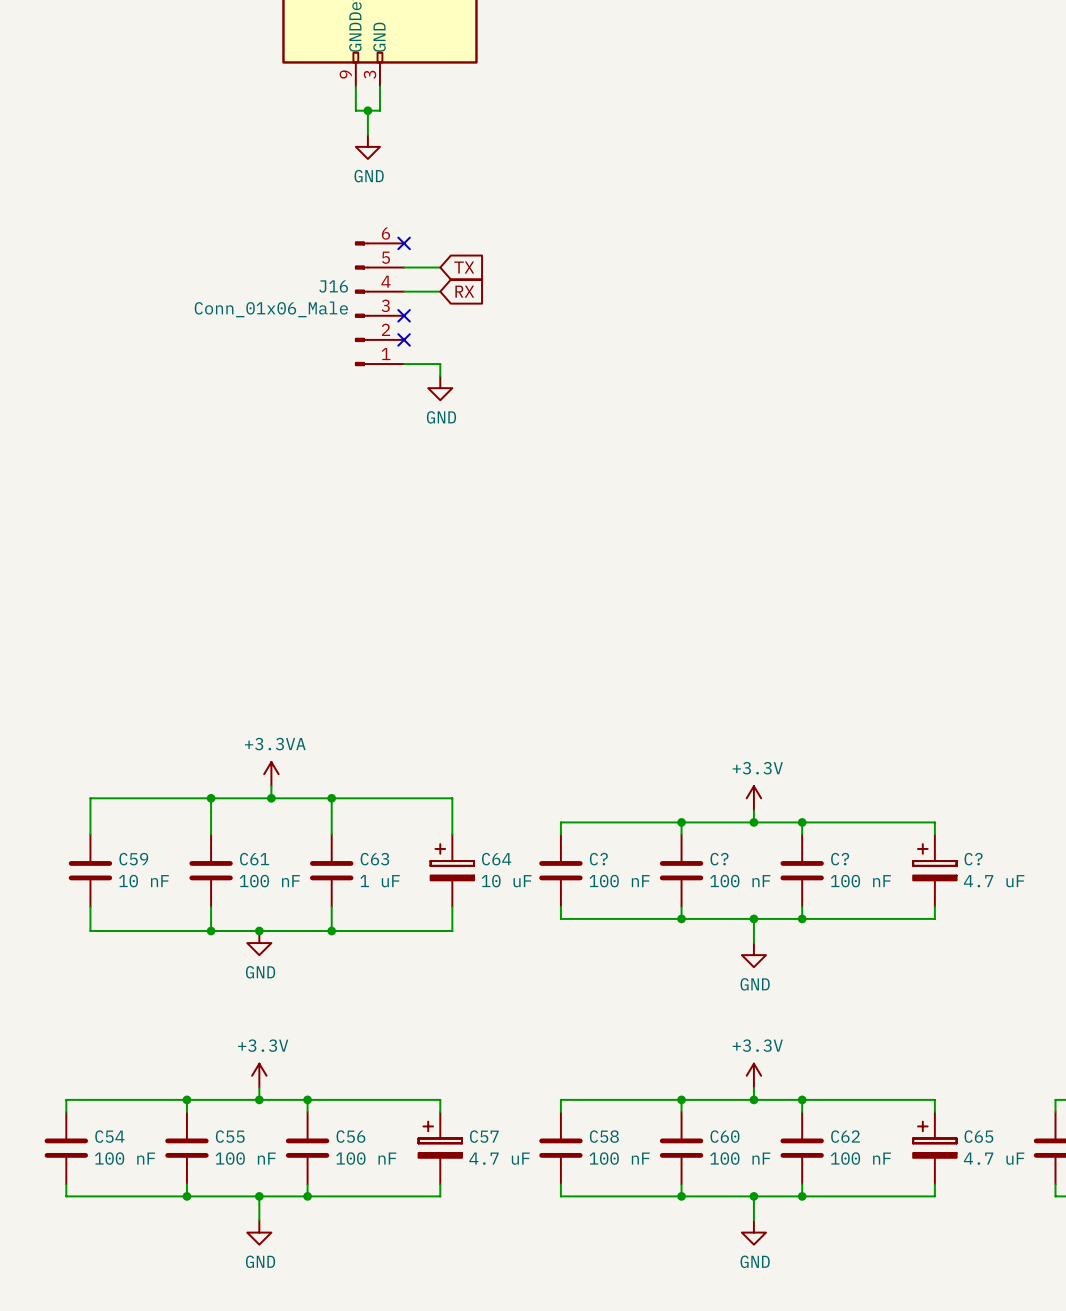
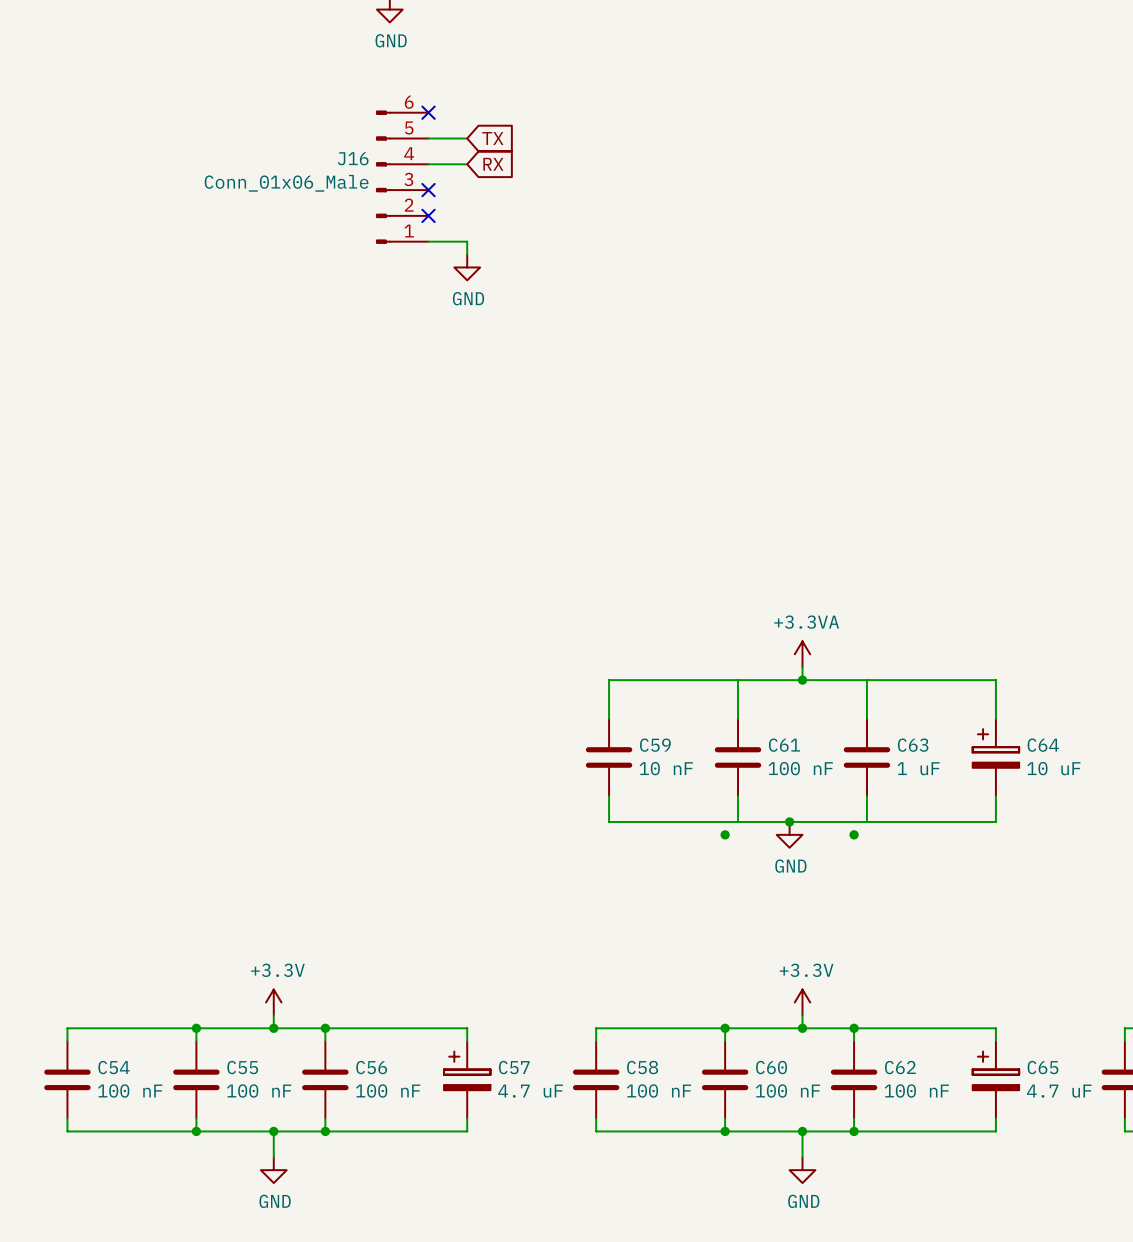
power symbol: none -> +3.3VA (802, 654)
power symbol: +3.3VA (271, 774) -> none
wire: none -> (738, 680) (738, 718)
junction: none -> (802, 680)
wire: none -> (866, 680) (866, 718)
wire: (271, 786) (271, 798) -> none
wire: (211, 798) (211, 834) -> none
junction: (211, 798) -> none
junction: (271, 798) -> none
wire: (331, 798) (331, 834) -> none
junction: (331, 798) -> none
power symbol: +3.3V (753, 798) -> none
wire: none -> (609, 718) (609, 680) (995, 680) (995, 718)
wire: (753, 810) (753, 822) -> (802, 667) (802, 680)
wire: (681, 822) (681, 834) -> none
junction: (681, 822) -> none
junction: (753, 822) -> none
wire: (802, 822) (802, 834) -> none
junction: (802, 822) -> none
wire: (90, 834) (90, 798) (452, 798) (452, 834) -> none
wire: (560, 834) (560, 822) (934, 822) (934, 834) -> none
C59 position: (90, 870) -> (609, 757)
C61 position: (211, 870) -> (738, 757)
C63 position: (331, 870) -> (866, 757)
C64 position: (452, 870) -> (995, 757)
C?: 100 nF (560, 870) -> none
C?: 100 nF (681, 870) -> none
C?: 100 nF (802, 870) -> none
C?: 4.7 uF (934, 870) -> none
wire: none -> (609, 796) (609, 821) (995, 821) (995, 796)
wire: none -> (738, 796) (738, 821)
wire: (90, 906) (90, 931) (452, 931) (452, 906) -> none
wire: (211, 906) (211, 931) -> none
wire: (331, 906) (331, 931) -> none
wire: (560, 906) (560, 918) (934, 918) (934, 906) -> none
wire: (681, 906) (681, 918) -> none
wire: (802, 906) (802, 918) -> none
wire: (753, 918) (753, 943) -> (866, 796) (866, 821)
junction position: (753, 918) -> (789, 821)
junction: (211, 931) -> none
junction: (259, 931) -> none
junction: (331, 931) -> none
power symbol: GND (259, 943) -> none
power symbol position: GND (753, 955) -> GND (789, 834)

